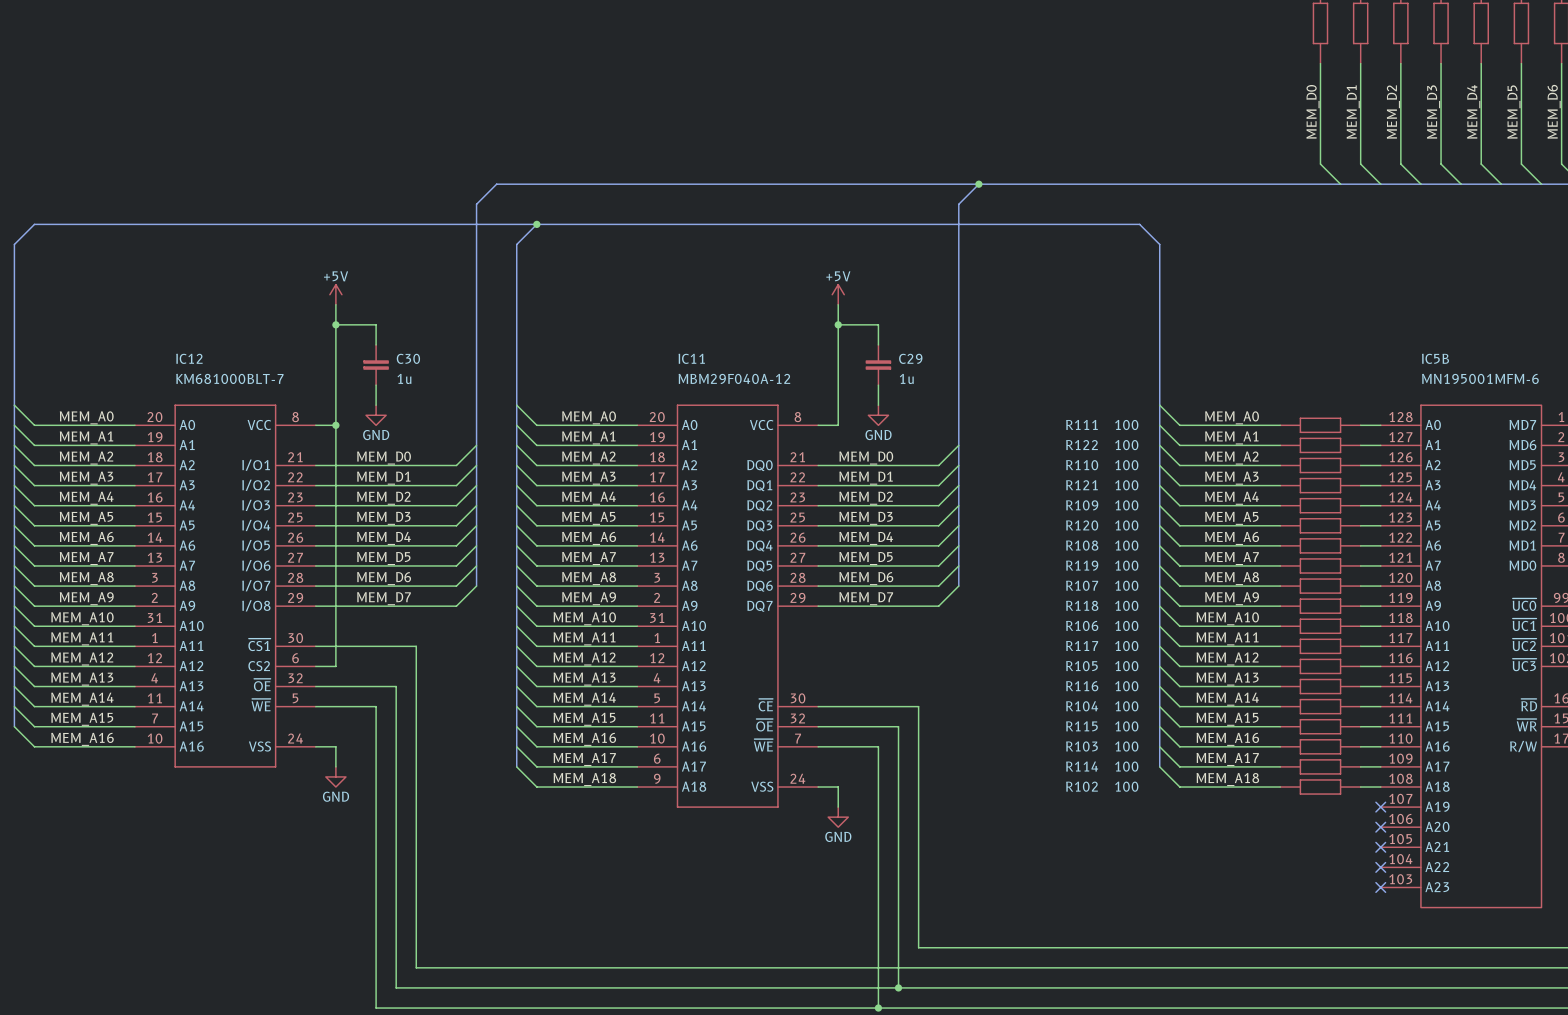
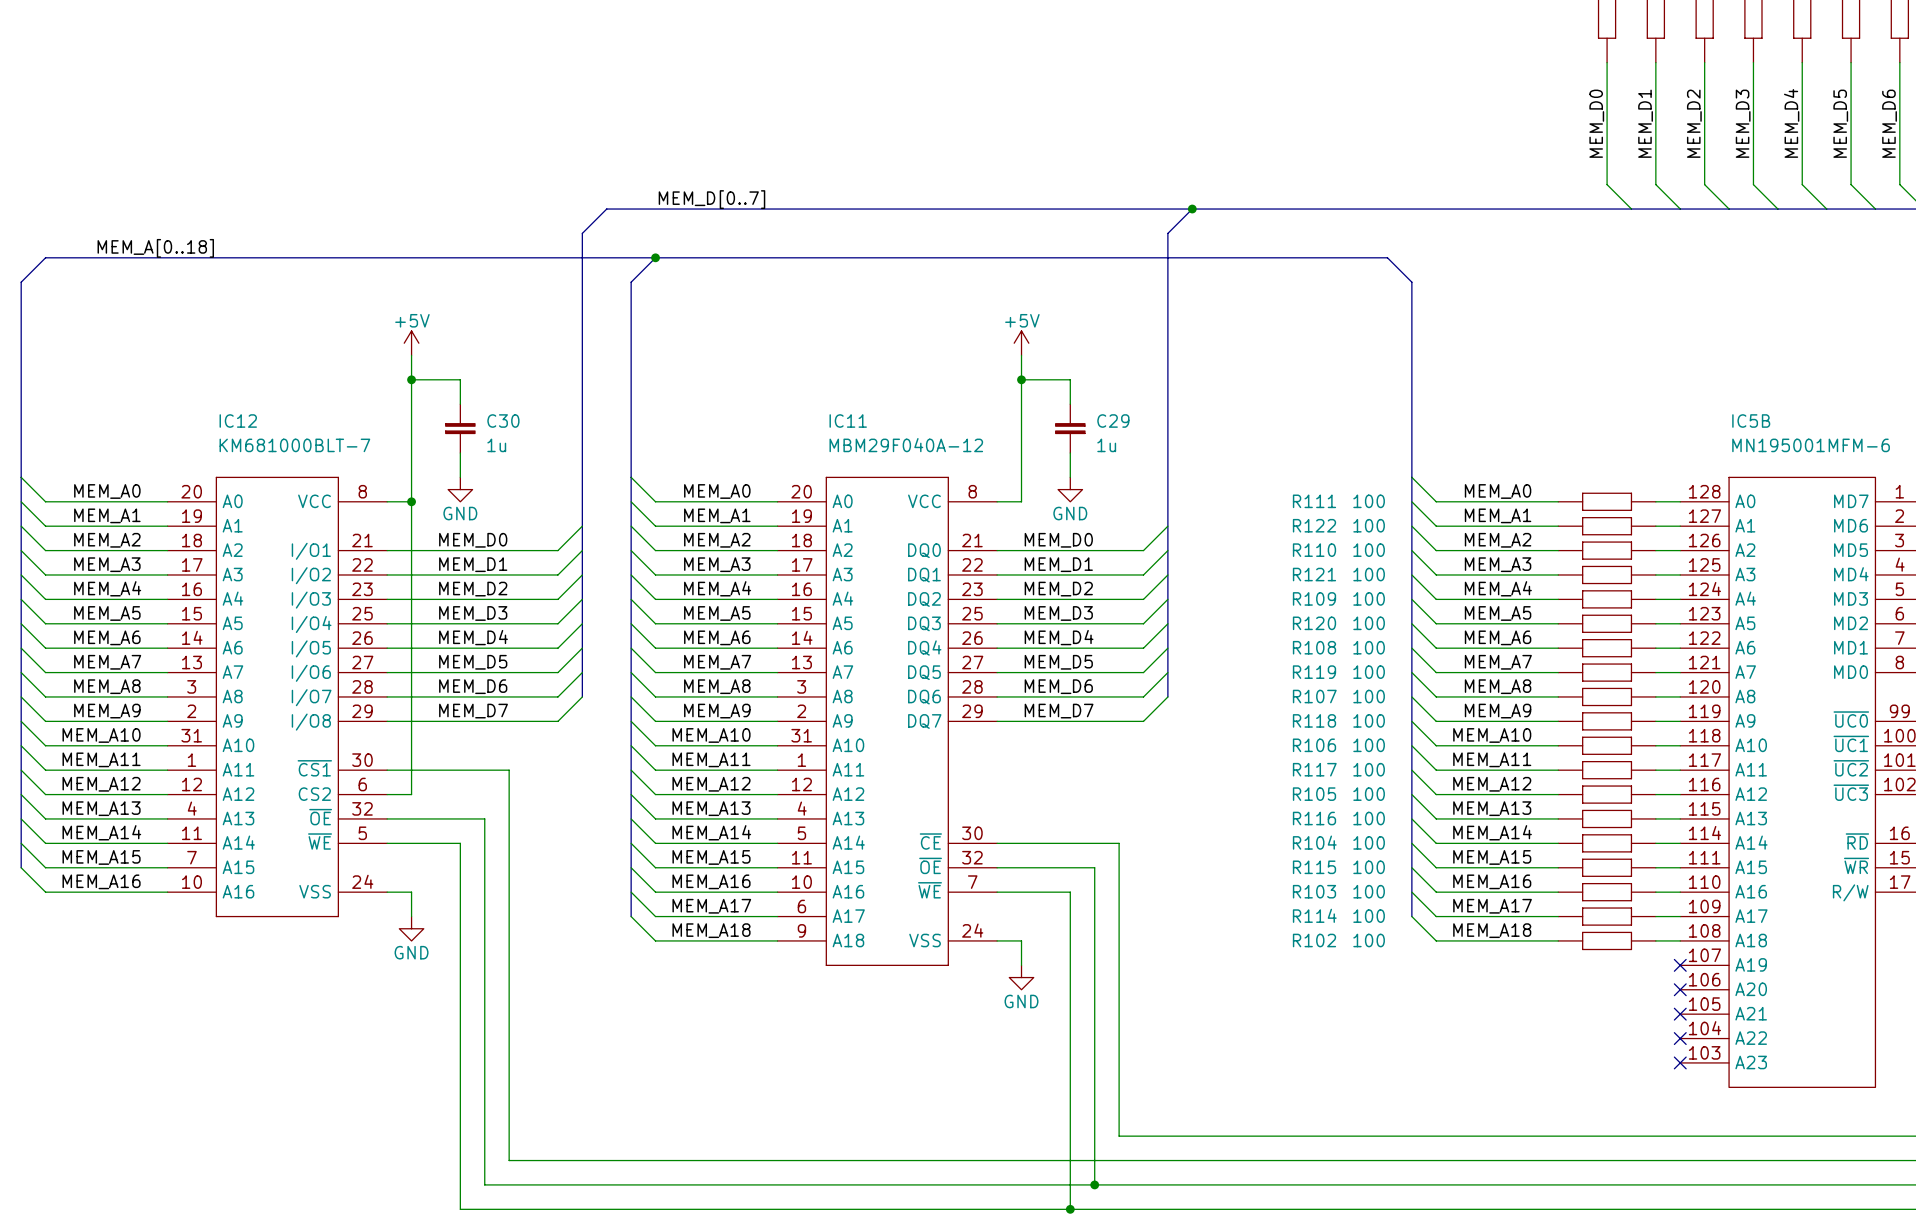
label: none -> MEM_D[0..7] (711, 199)
label: none -> MEM_A[0..18] (155, 248)

